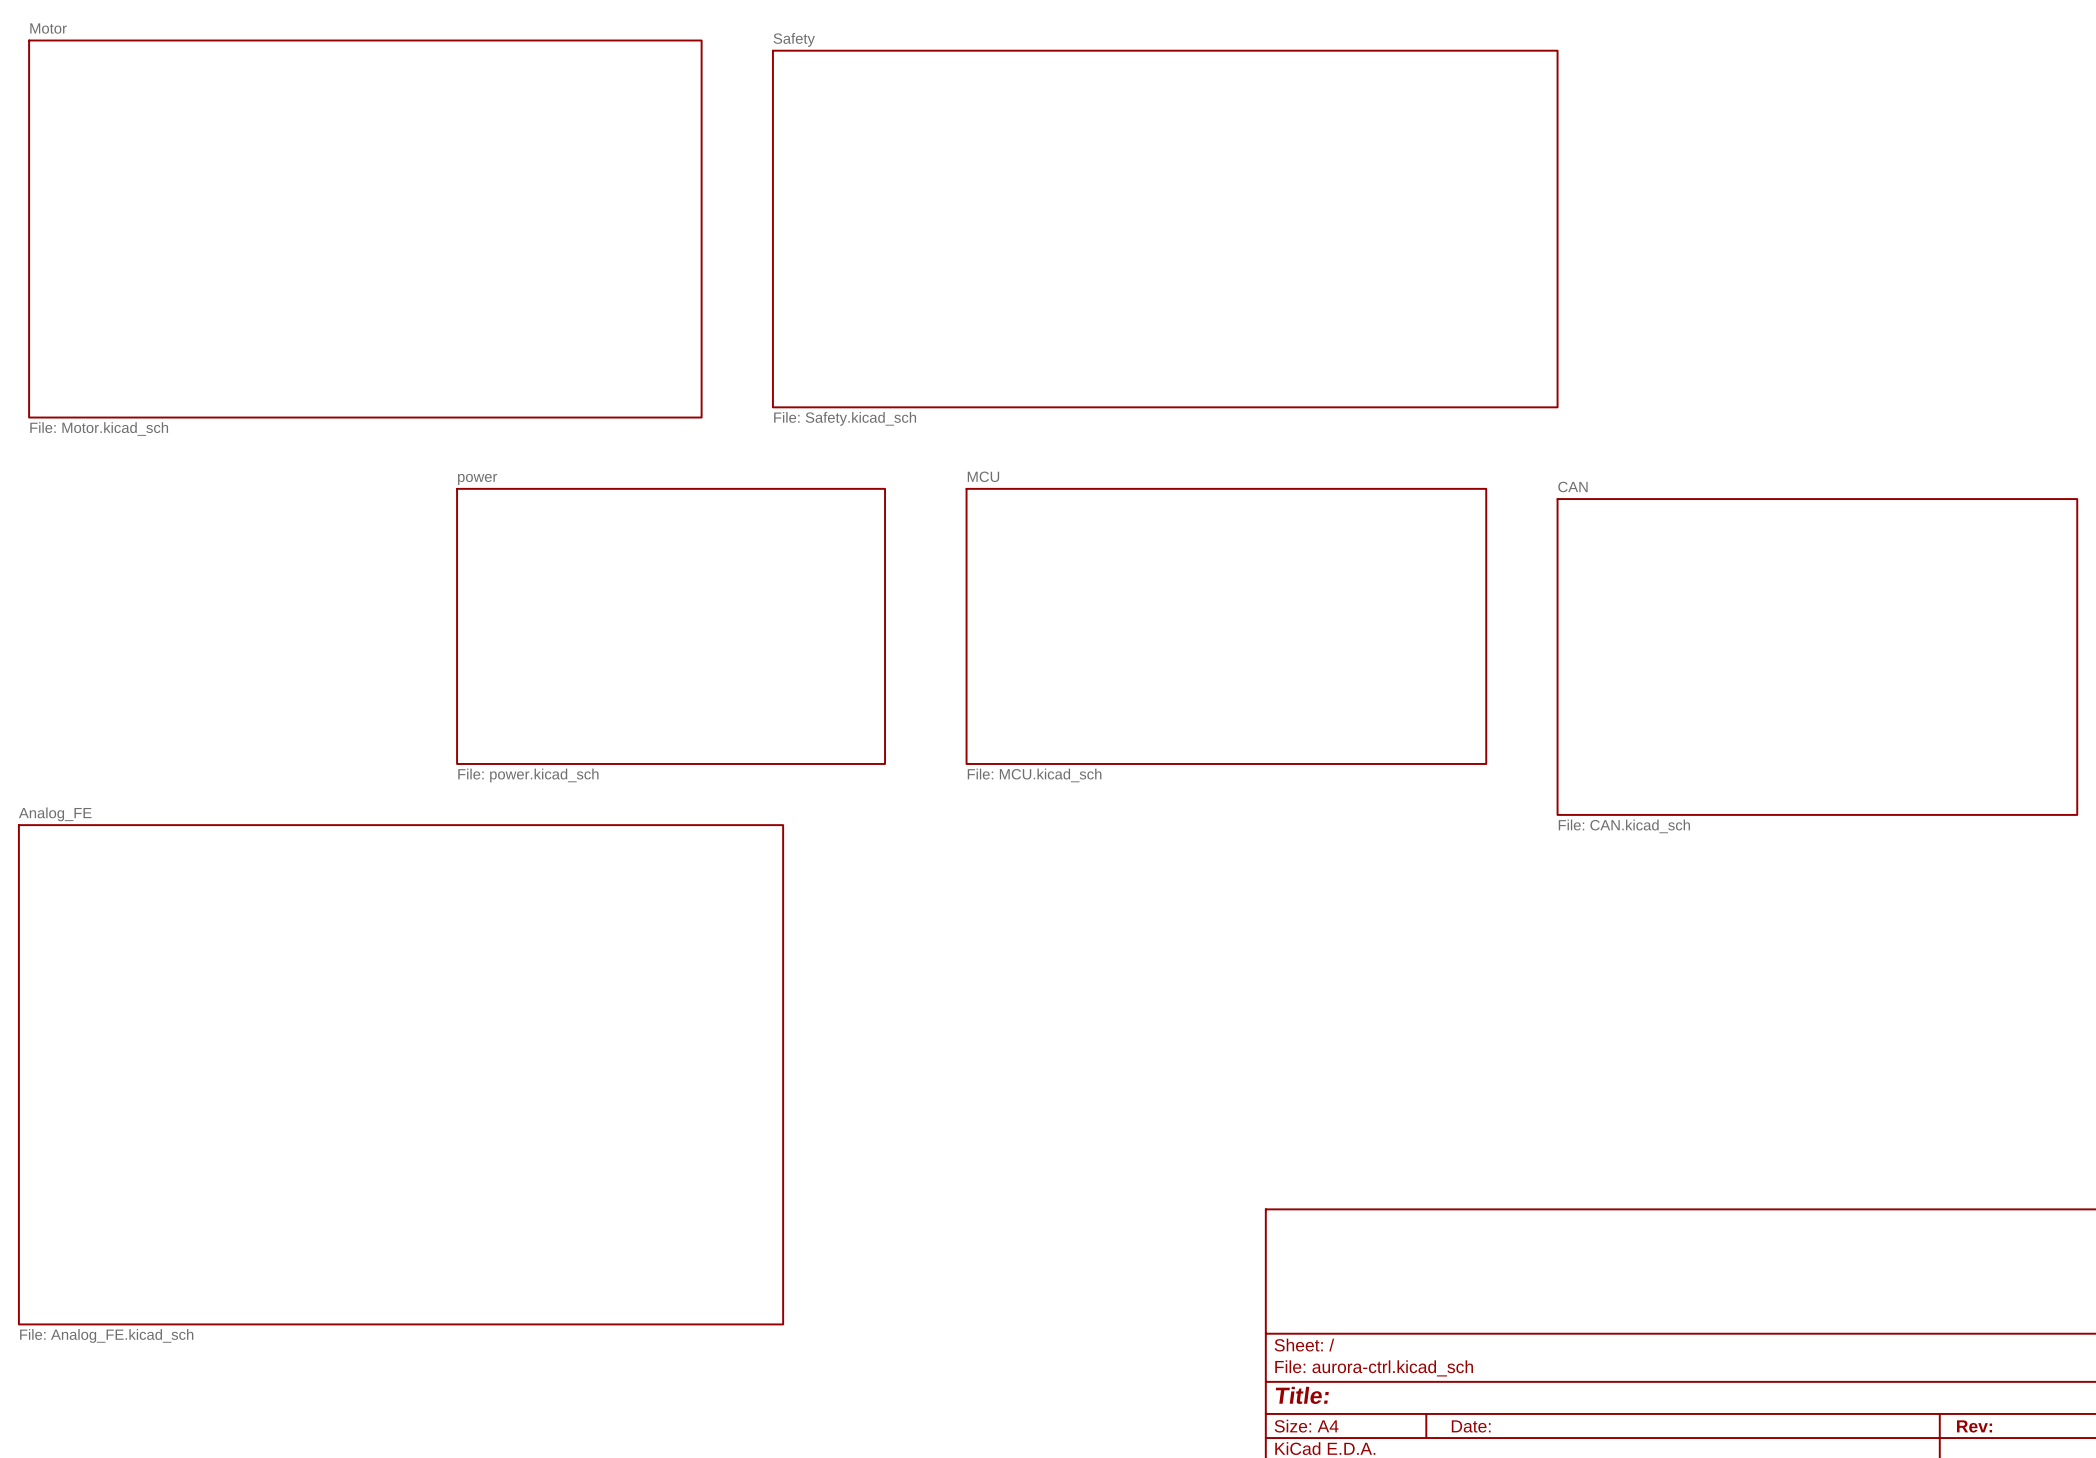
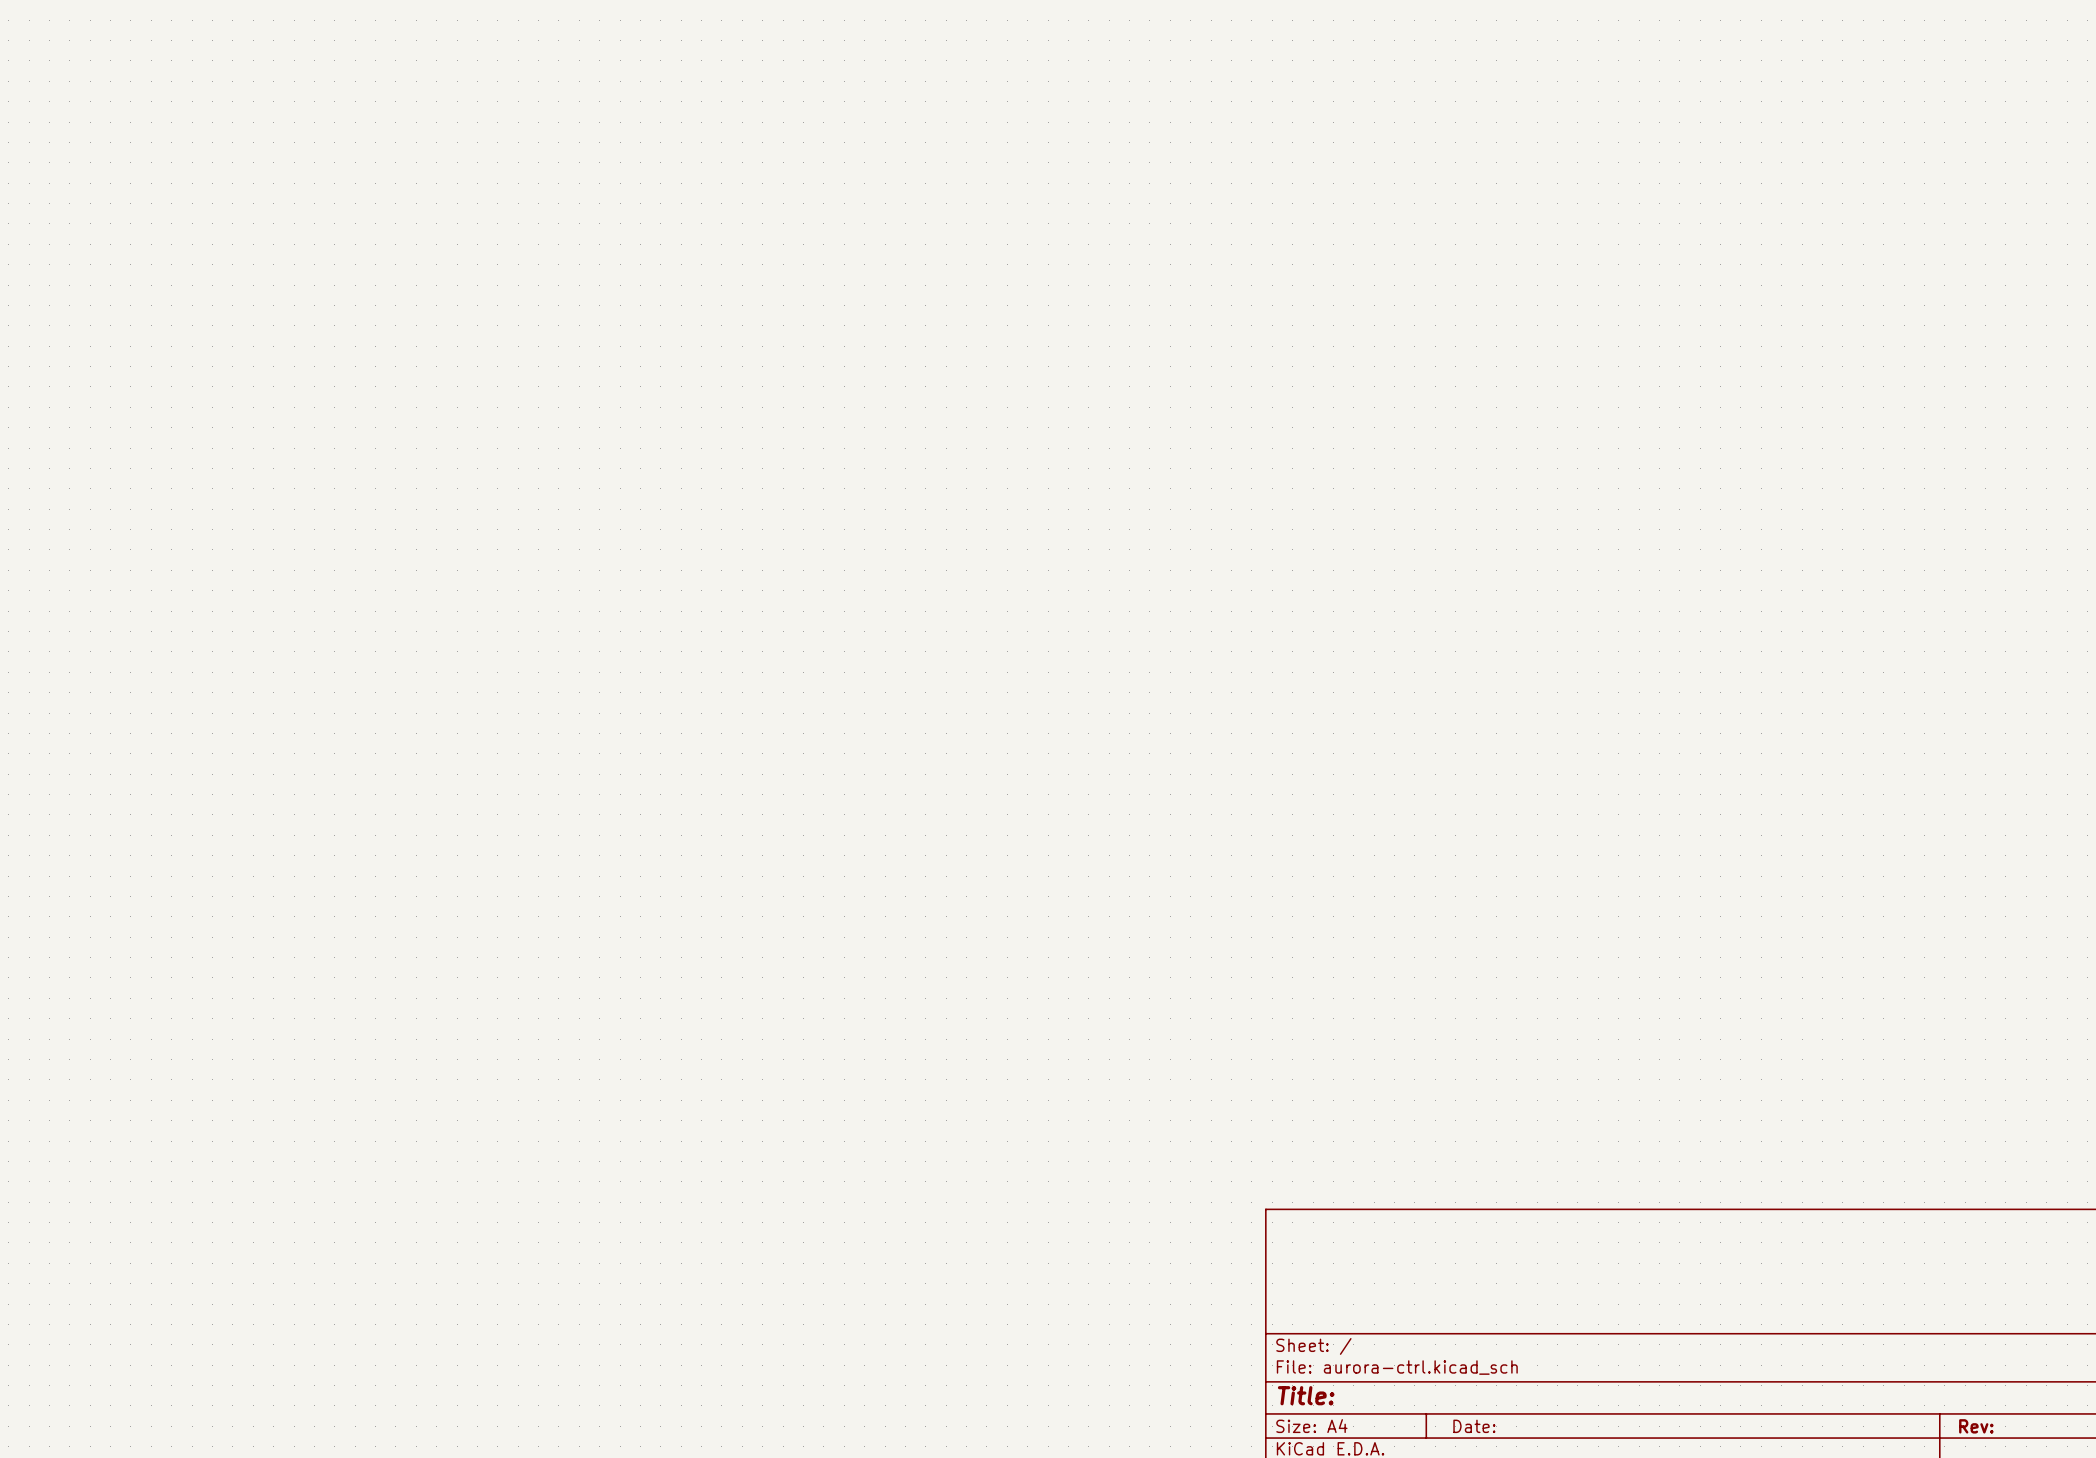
sheet Motor: File: Motor.kicad_sch (365, 229) -> none
sheet Safety: File: Safety.kicad_sch (1165, 229) -> none
sheet power: File: power.kicad_sch (671, 626) -> none
sheet MCU: File: MCU.kicad_sch (1226, 626) -> none
sheet CAN: File: CAN.kicad_sch (1817, 656) -> none
sheet Analog_FE: File: Analog_FE.kicad_sch (401, 1074) -> none

